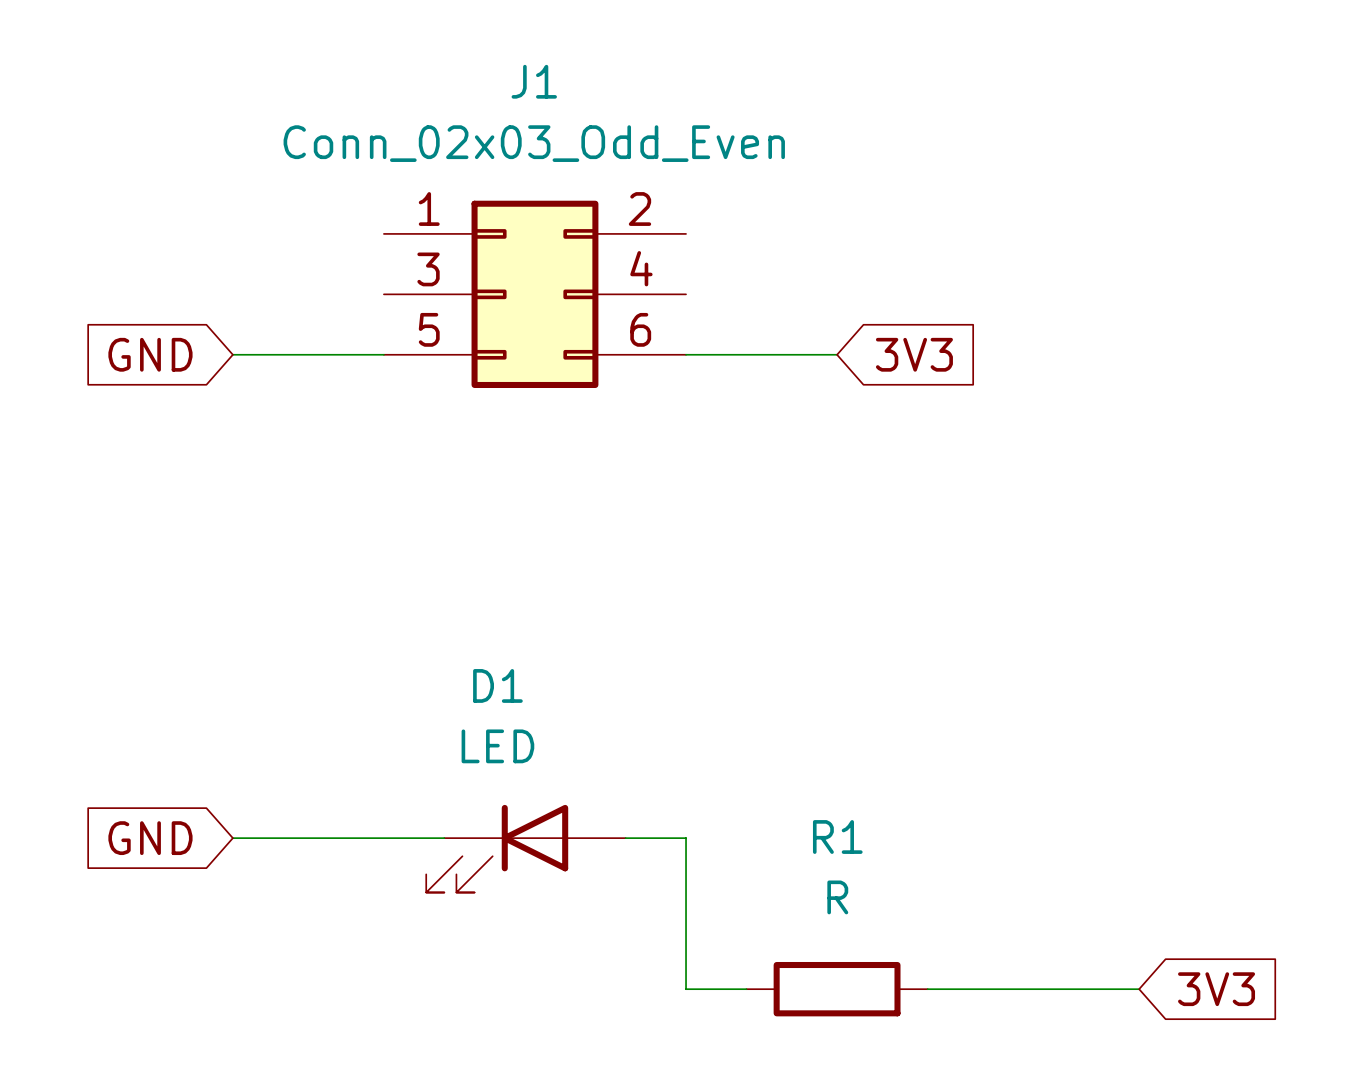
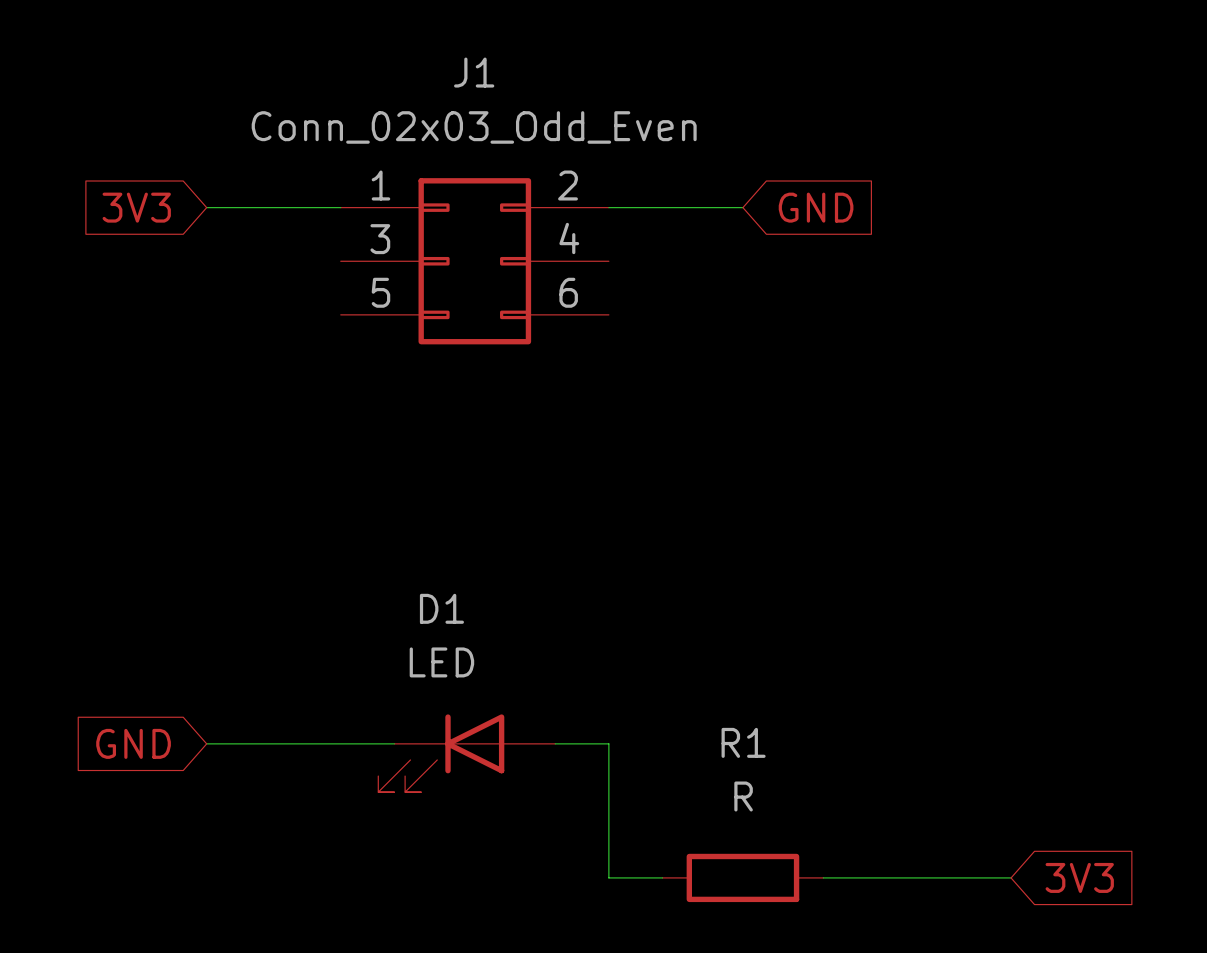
global label: none -> 3V3 (136, 207)
global label: none -> GND (816, 207)
global label: GND (150, 354) -> none
wire: (232, 354) (383, 354) -> (206, 207) (340, 207)
wire: (686, 354) (837, 354) -> (608, 207) (742, 207)
global label: 3V3 (914, 354) -> none

